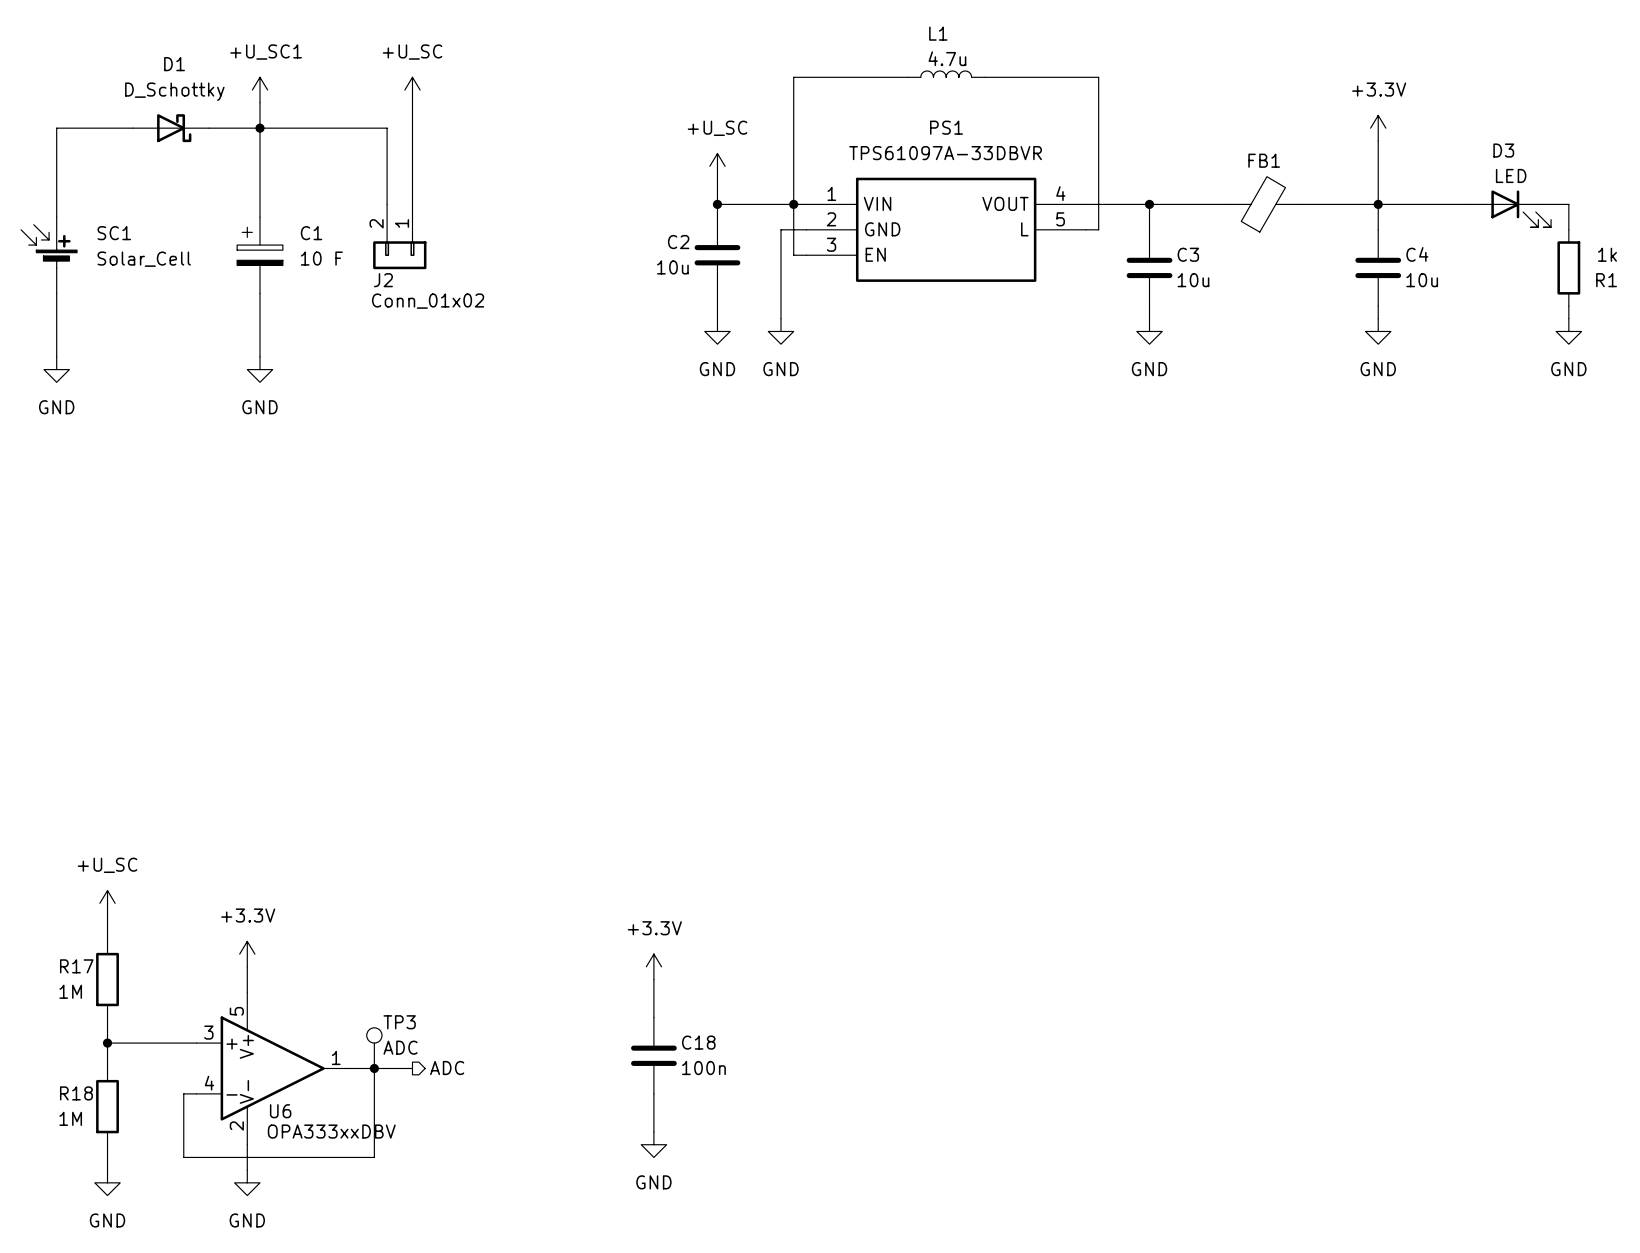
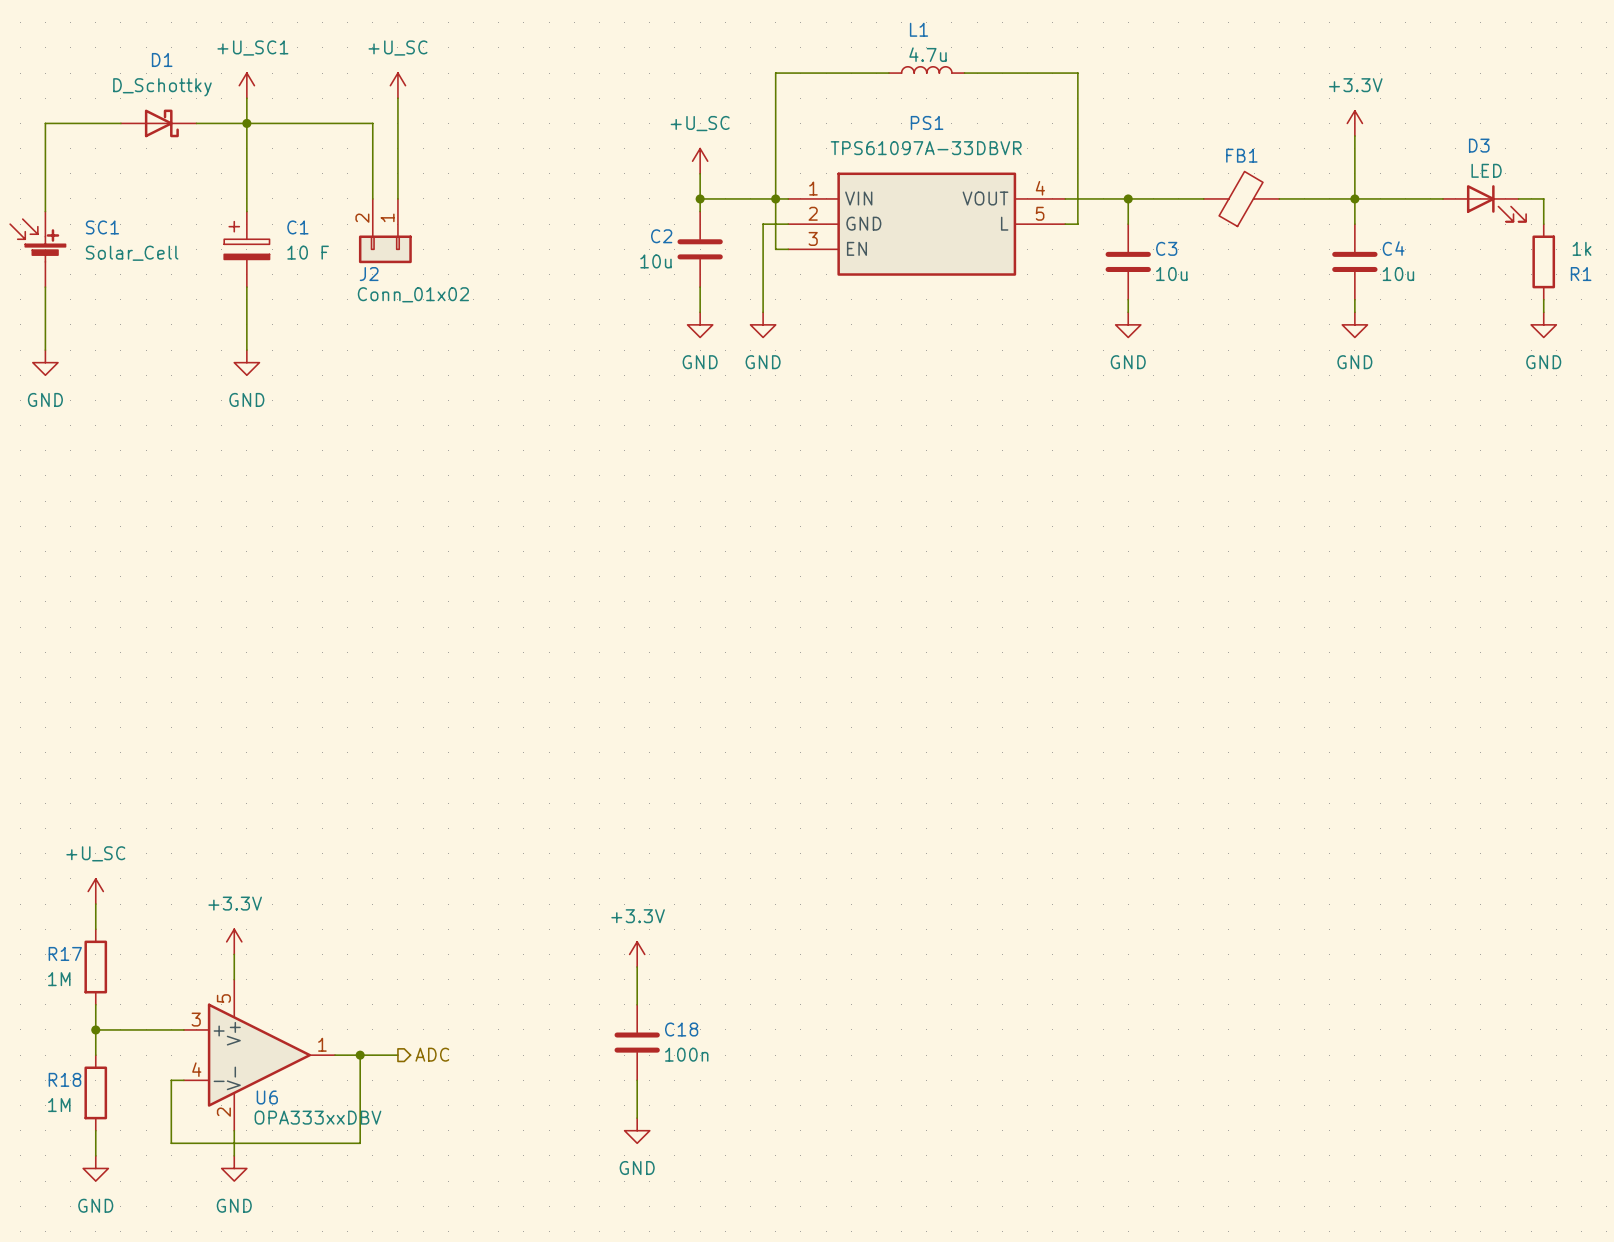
TP3: ADC (374, 1048) -> none

